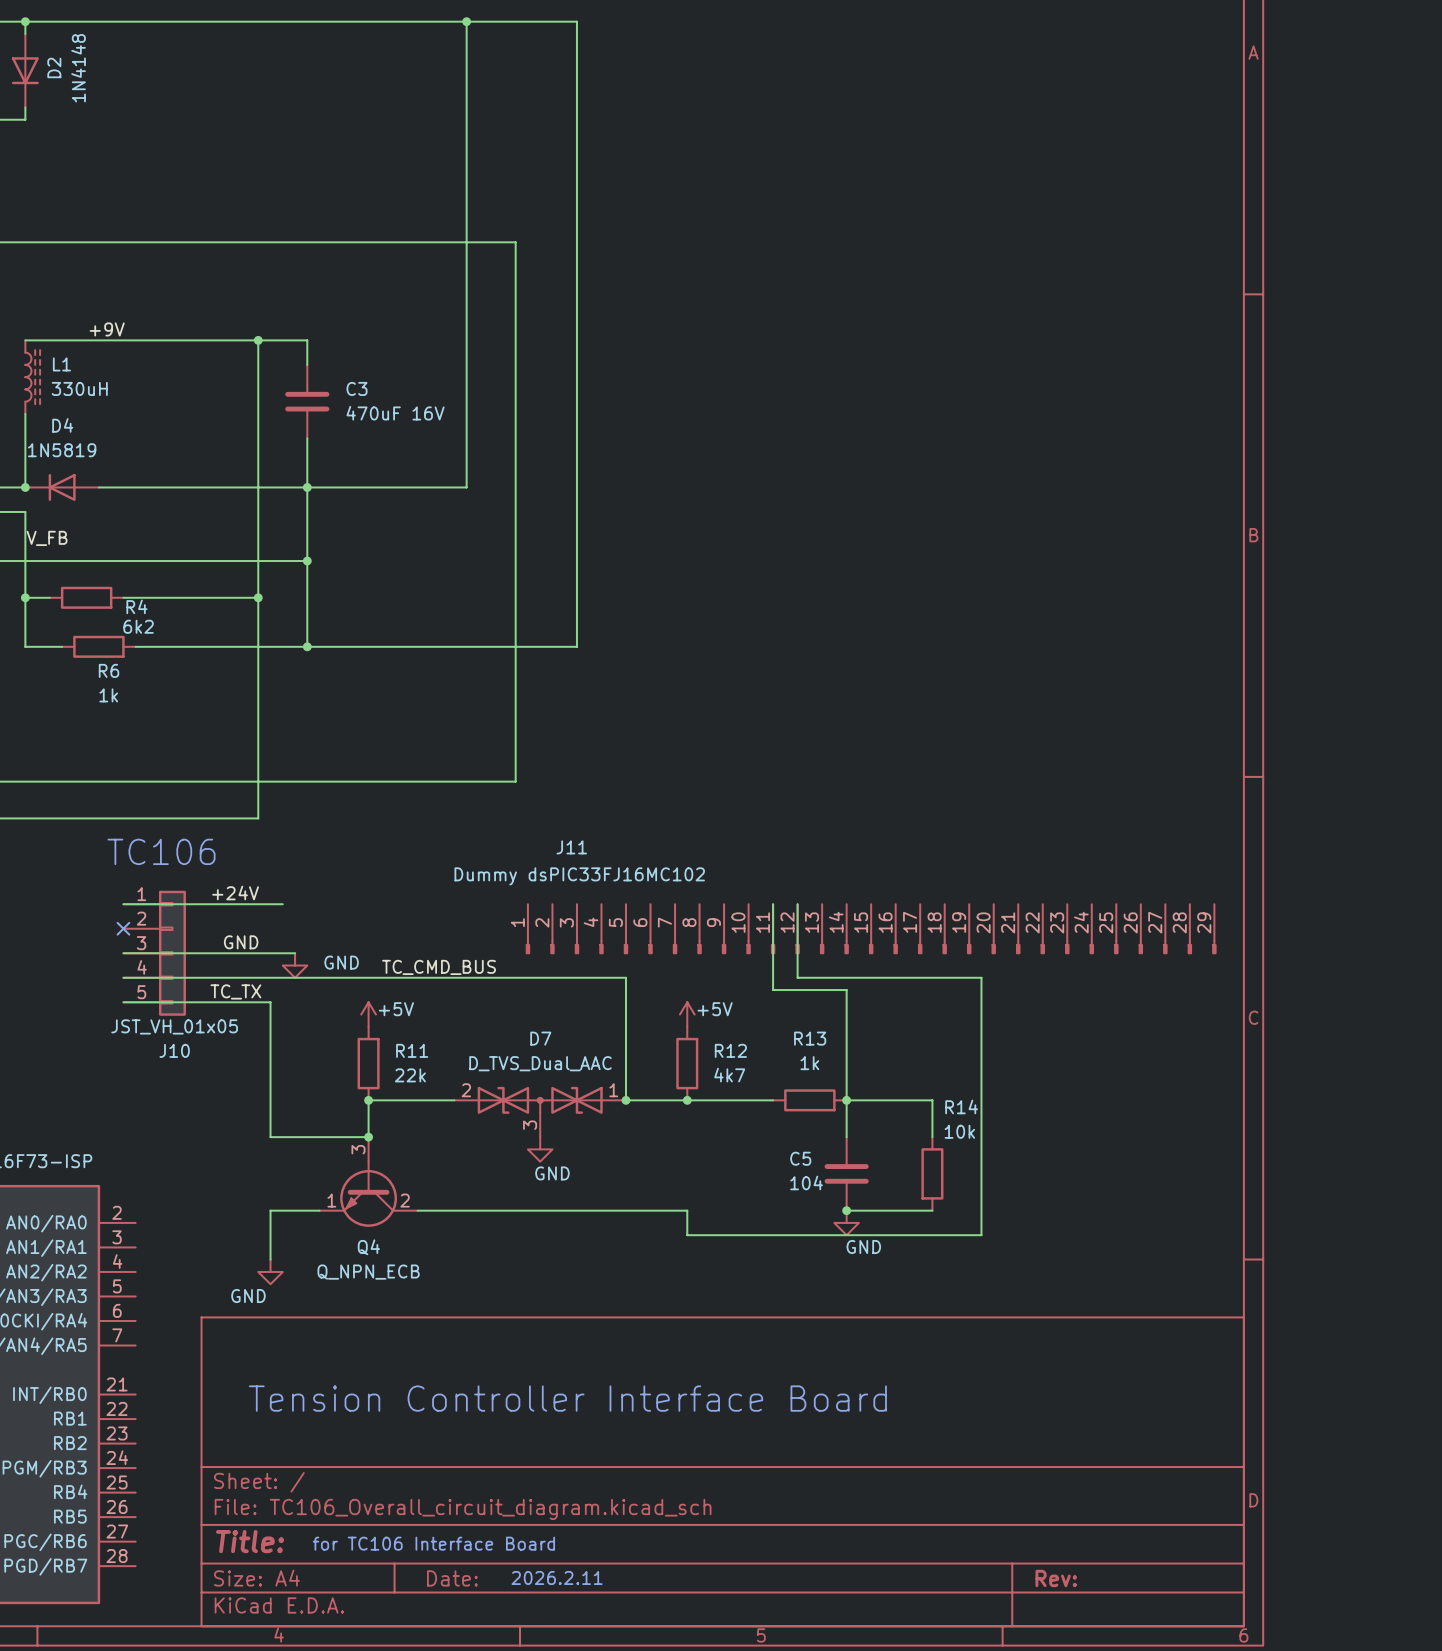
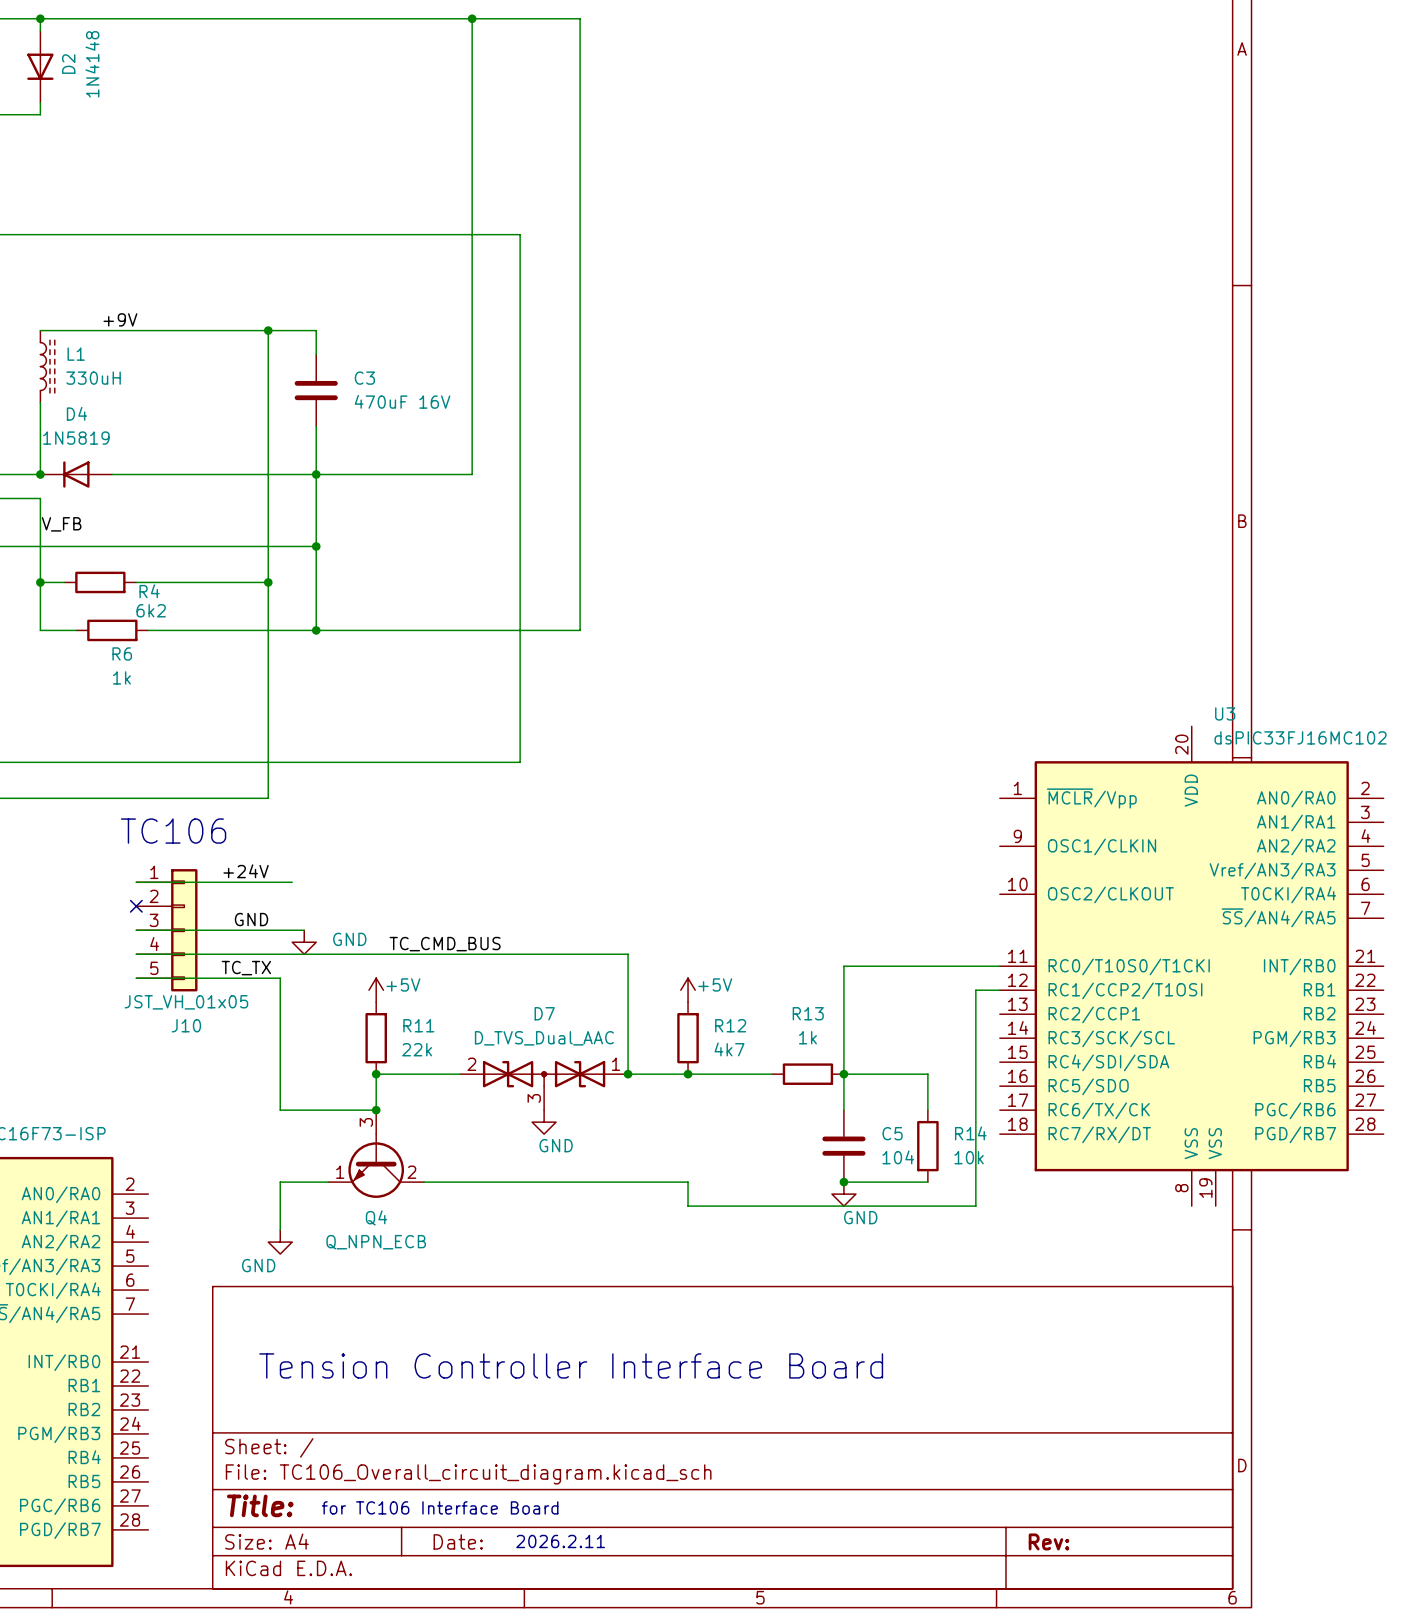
wire: (773, 904) (773, 990) (846, 990) -> (999, 966) (843, 966)
wire: (797, 904) (797, 977) (981, 977) (981, 1014) -> (999, 990) (975, 990)
J11: Dummy dsPIC33FJ16MC102 (871, 929) -> none
U3: none -> dsPIC33FJ16MC102 (1191, 966)
R14 name position: R14 (961, 1106) -> R14 (970, 1133)
R14 value position: 10k (959, 1131) -> 10k (969, 1157)
C5 name position: C5 (800, 1158) -> C5 (892, 1133)
C5 value position: 104 (806, 1182) -> 104 (898, 1157)

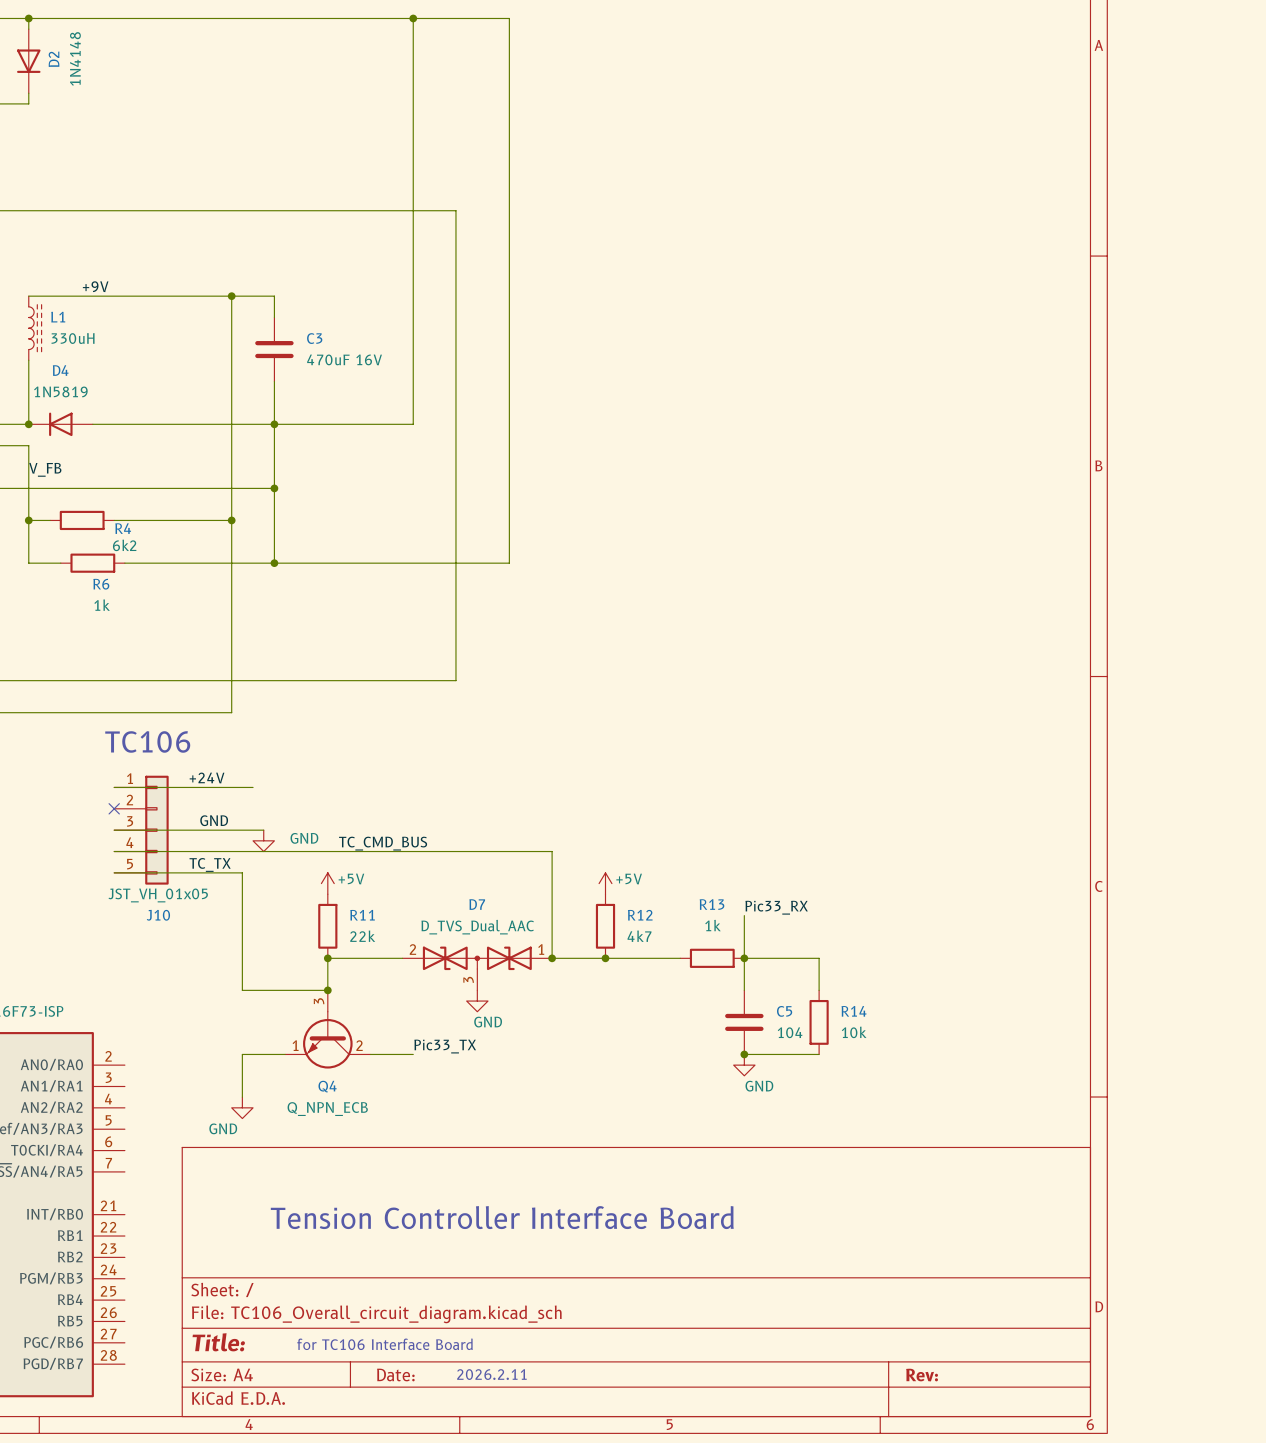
wire: (999, 966) (843, 966) (843, 1026) -> none
U3: dsPIC33FJ16MC102 (1191, 966) -> none
wire: (999, 990) (975, 990) (975, 1206) (688, 1206) (688, 1182) (472, 1182) -> none
label: none -> Pic33_RX (776, 907)
label: none -> Pic33_TX (445, 1046)

